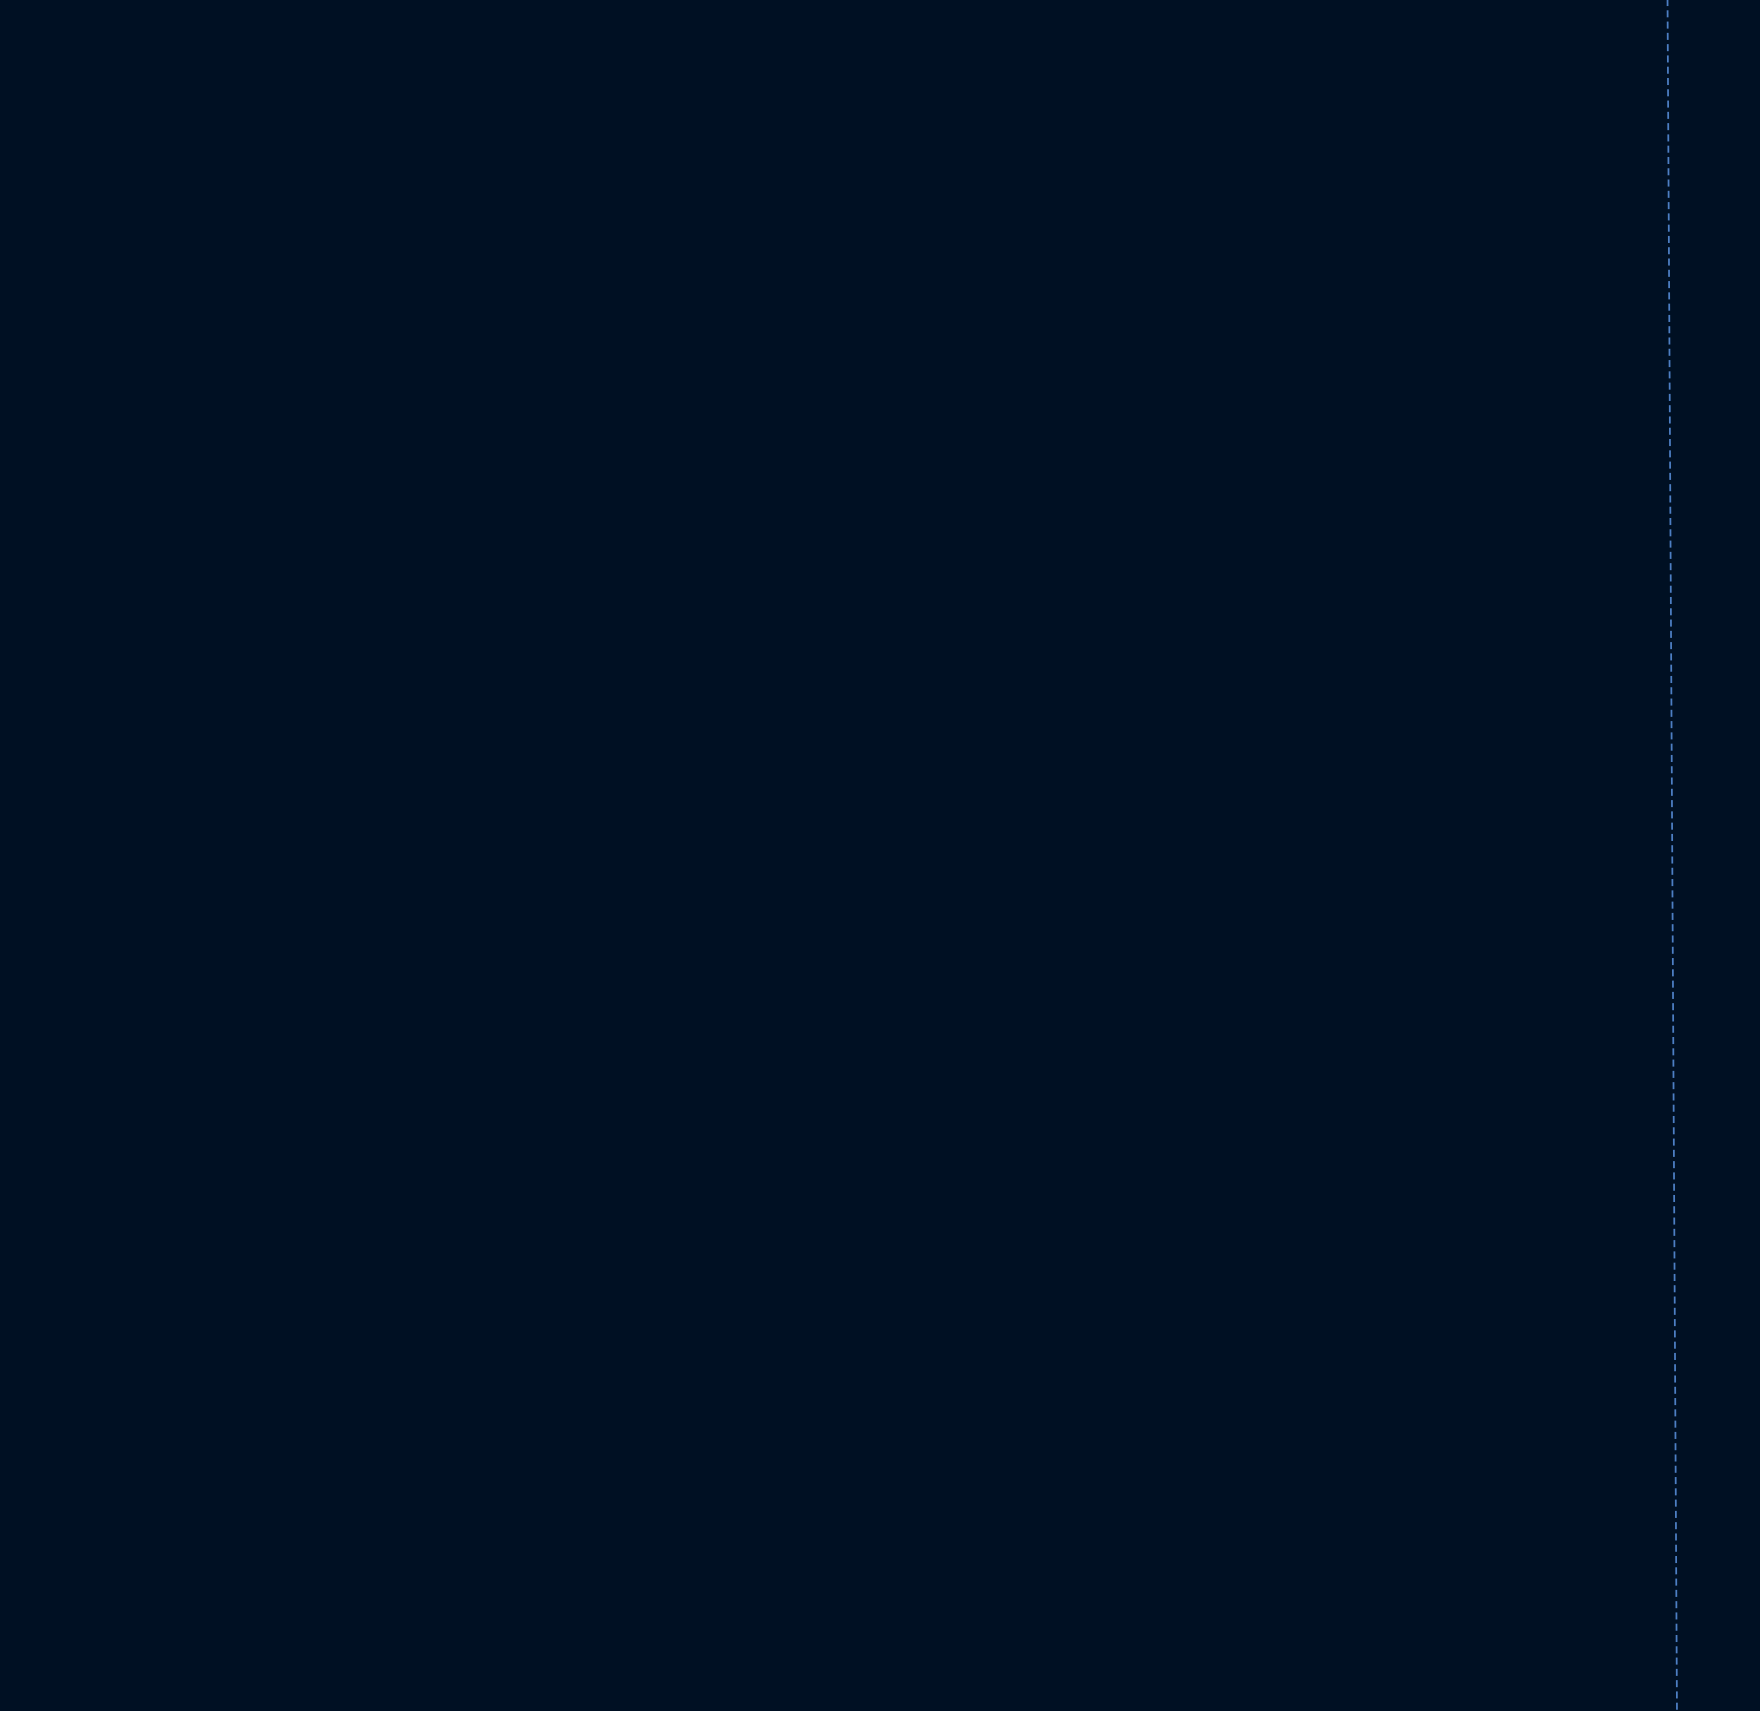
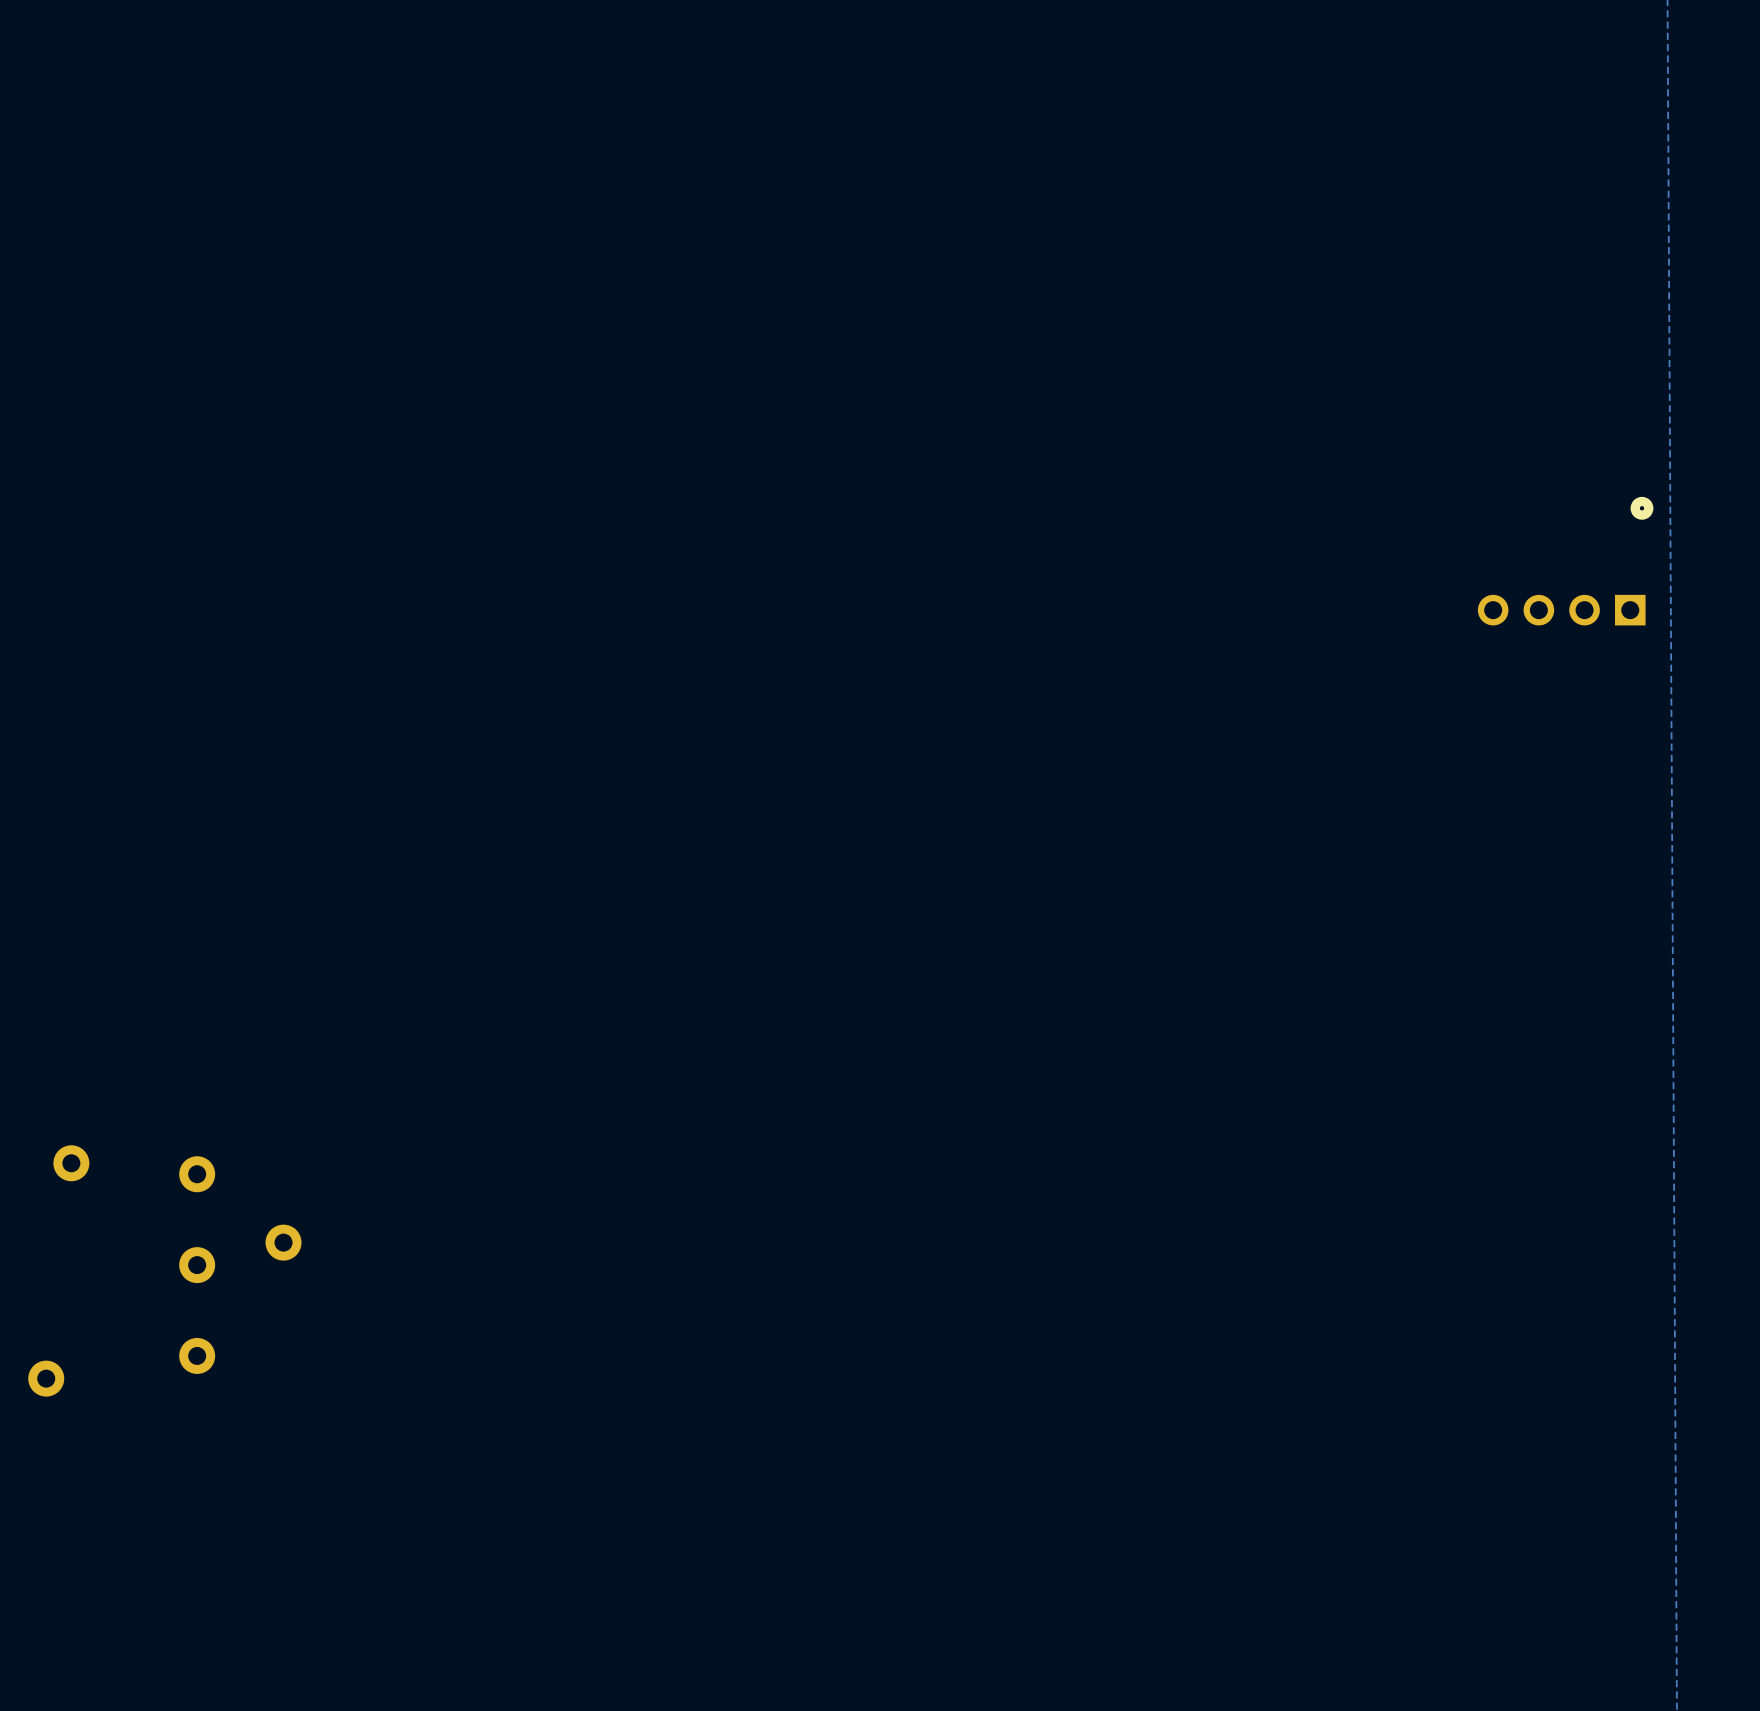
part: none -> (1641, 508)
part: none -> (1561, 610)
part: none -> (71, 1163)
part: none -> (197, 1174)
part: none -> (283, 1242)
part: none -> (197, 1265)
part: none -> (197, 1355)
part: none -> (46, 1378)

